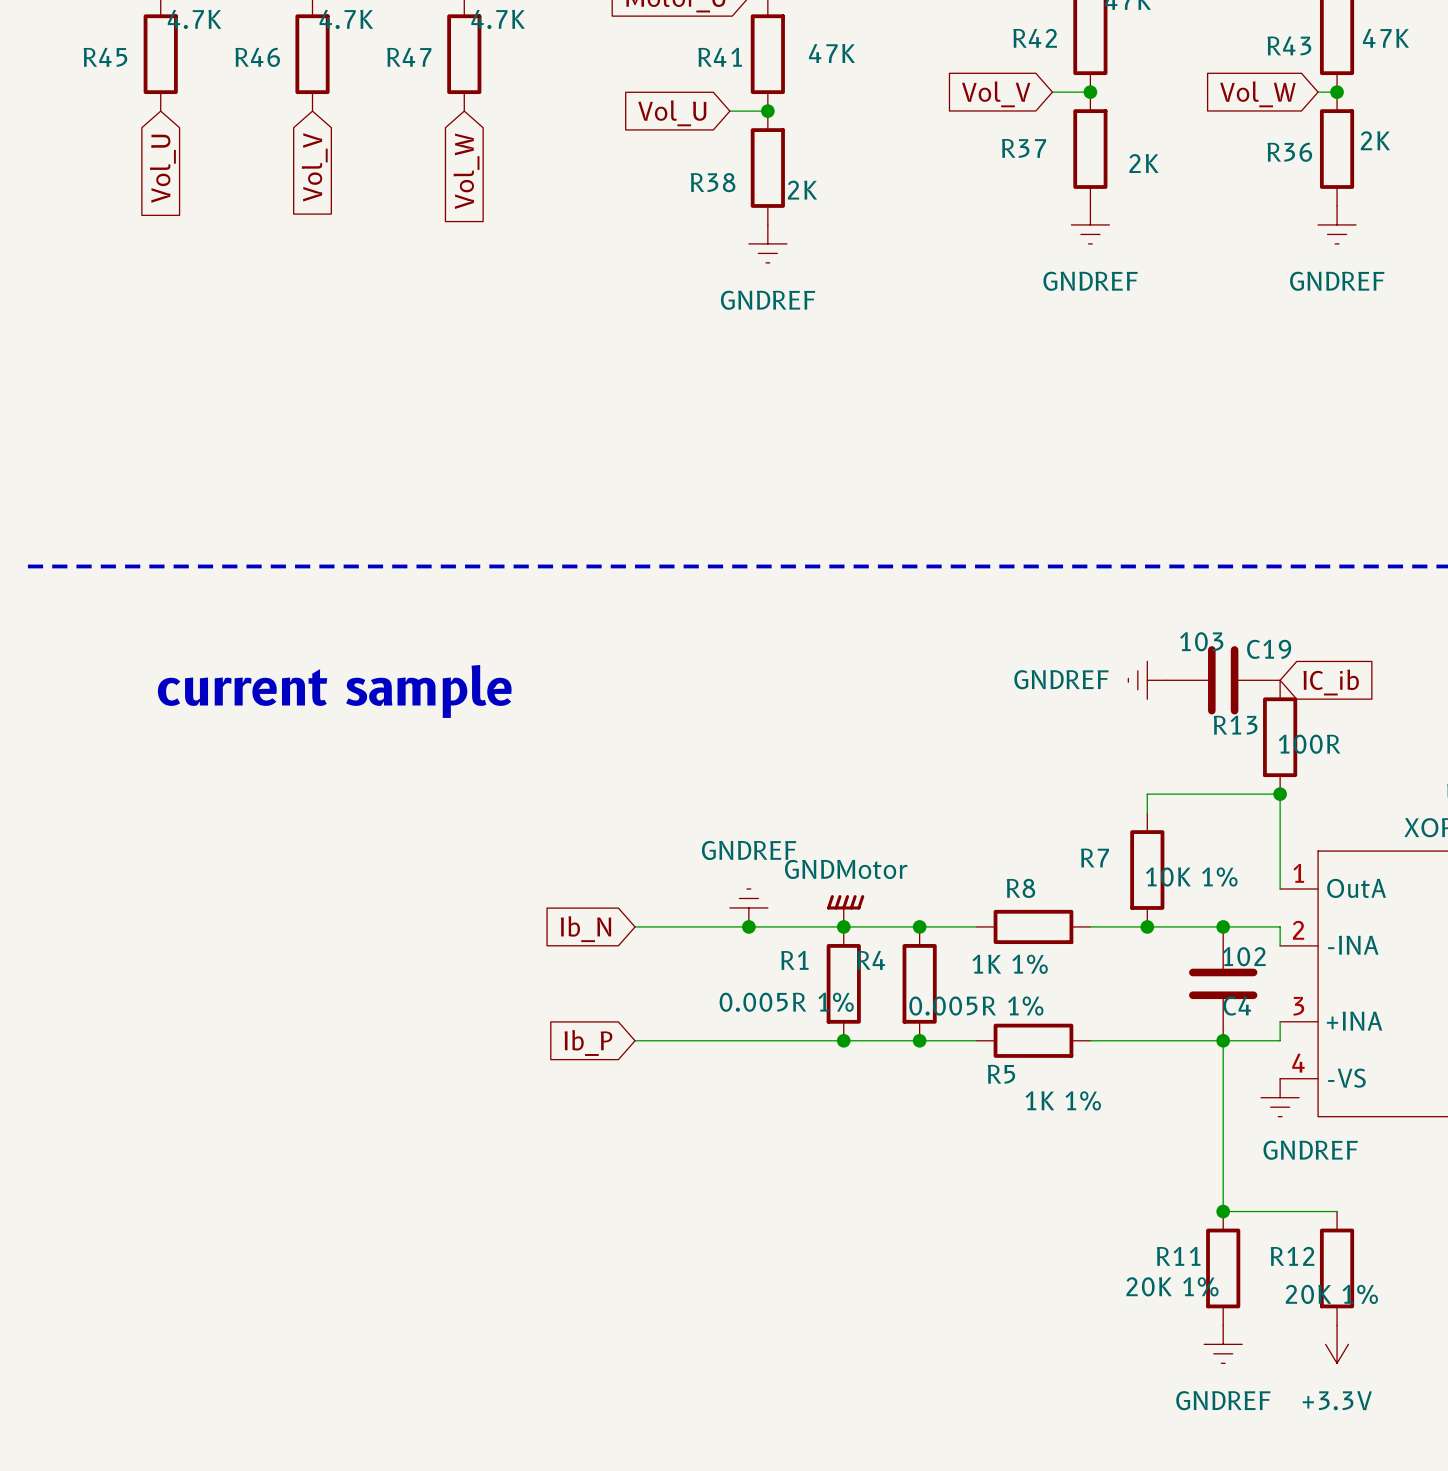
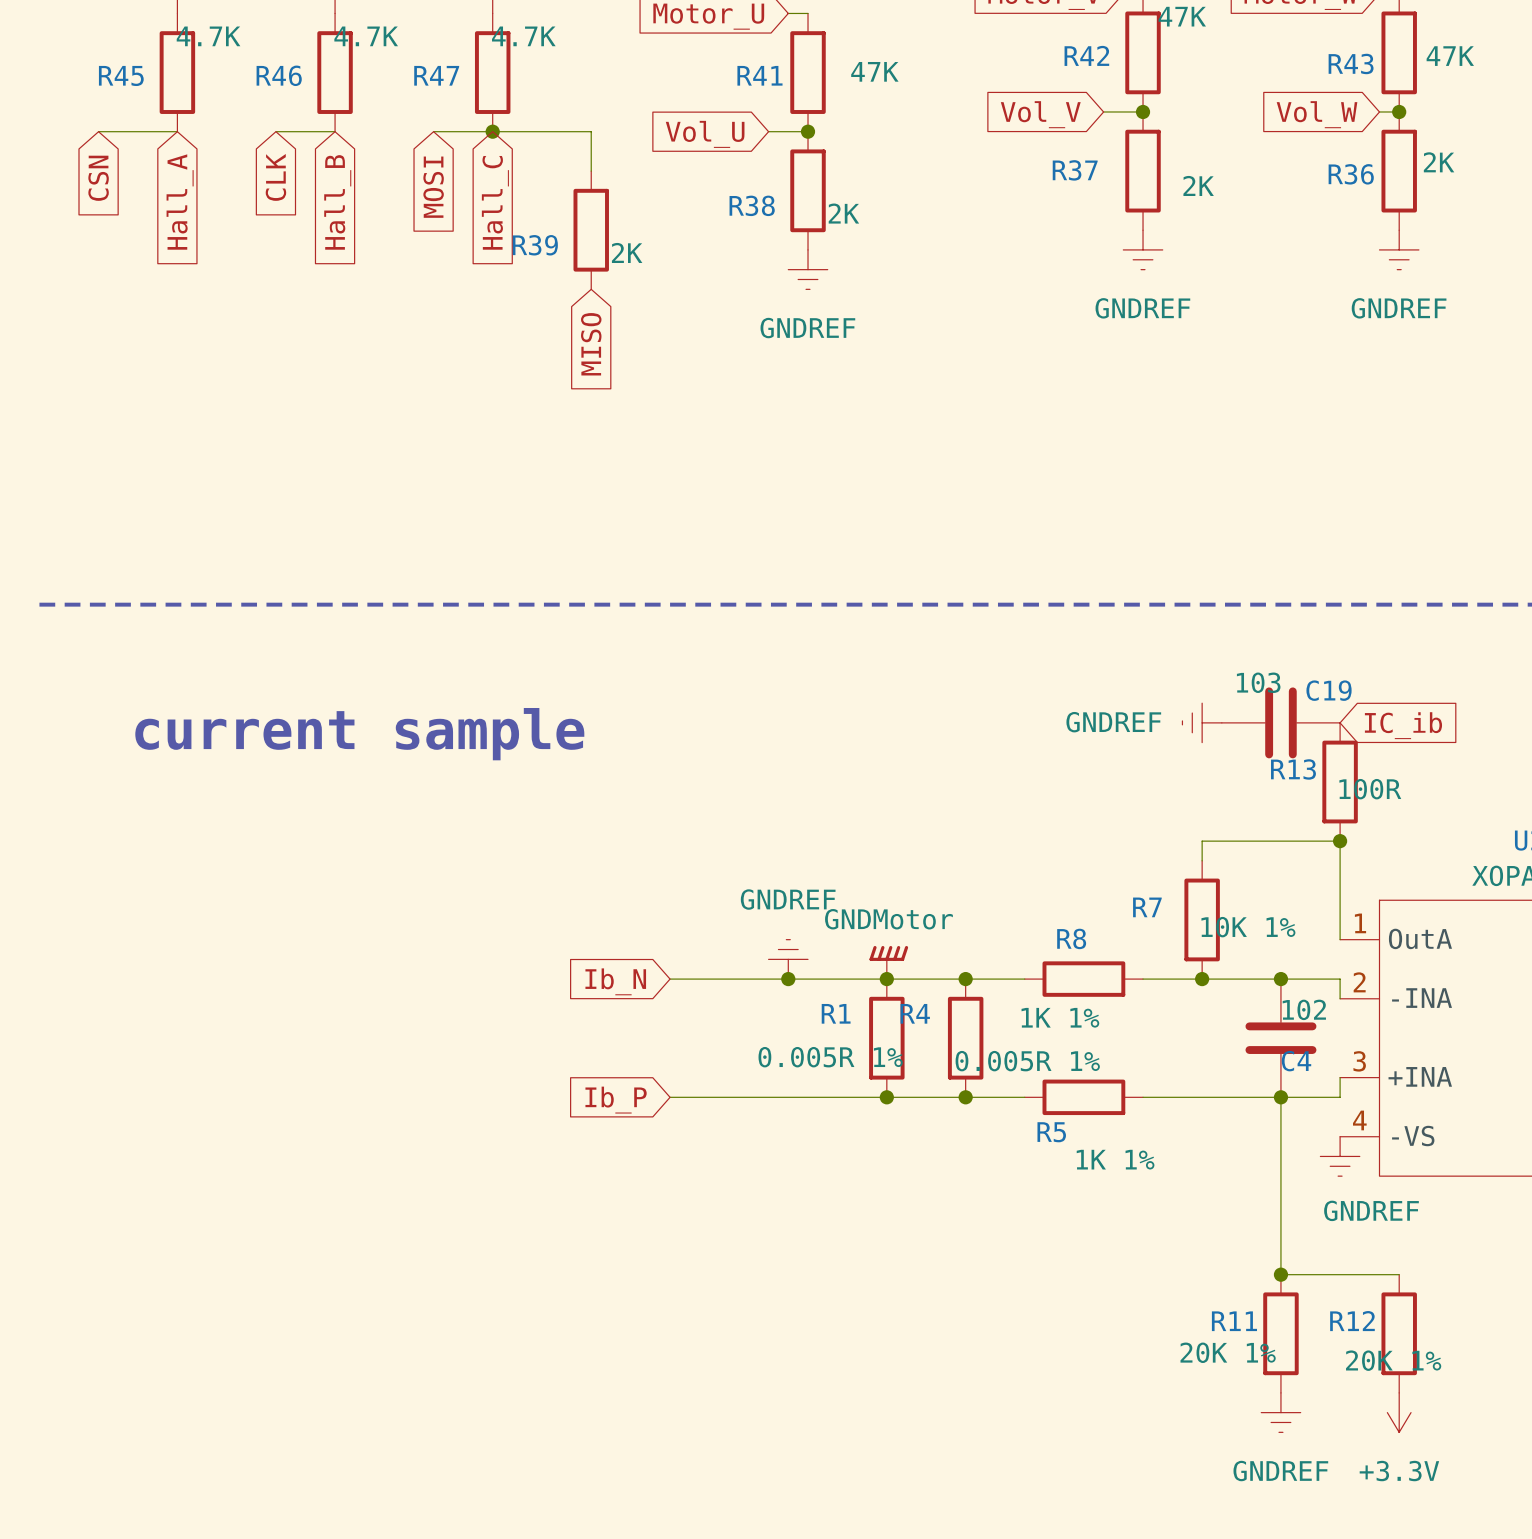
wire: none -> (98, 131) (177, 131)
wire: none -> (275, 131) (335, 131)
wire: none -> (433, 131) (591, 131) (591, 171)
junction: none -> (492, 131)
global label: none -> CLK (275, 177)
global label: none -> CSN (98, 178)
global label: none -> MOSI (433, 187)
global label: Vol_V (314, 167) -> Hall_B (337, 202)
global label: Vol_U (162, 168) -> Hall_A (180, 202)
global label: Vol_W (466, 171) -> Hall_C (495, 202)
R39: none -> 2K (591, 230)
global label: none -> MISO (591, 344)

